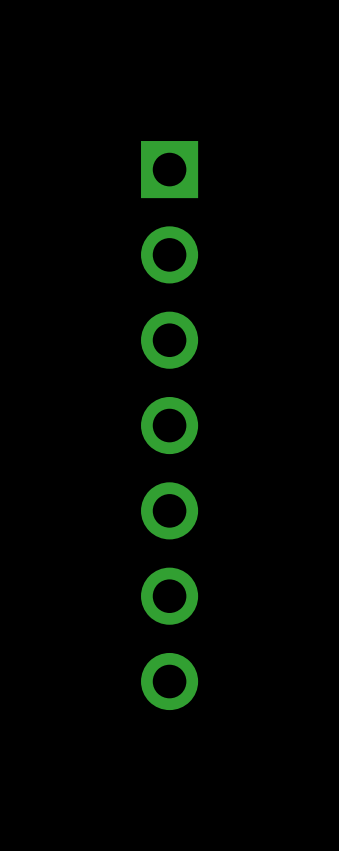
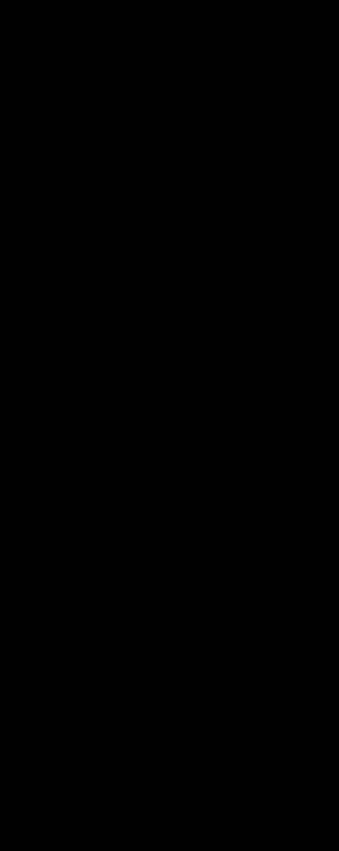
part: (169, 425) -> none

